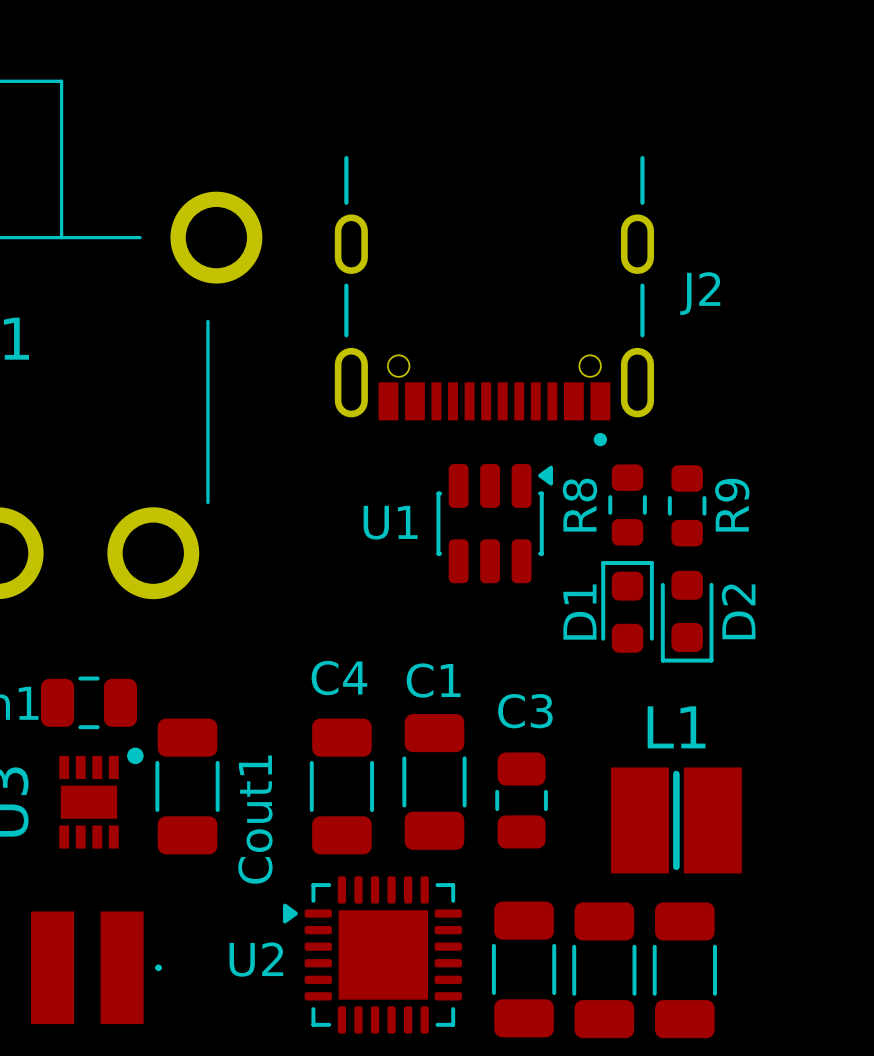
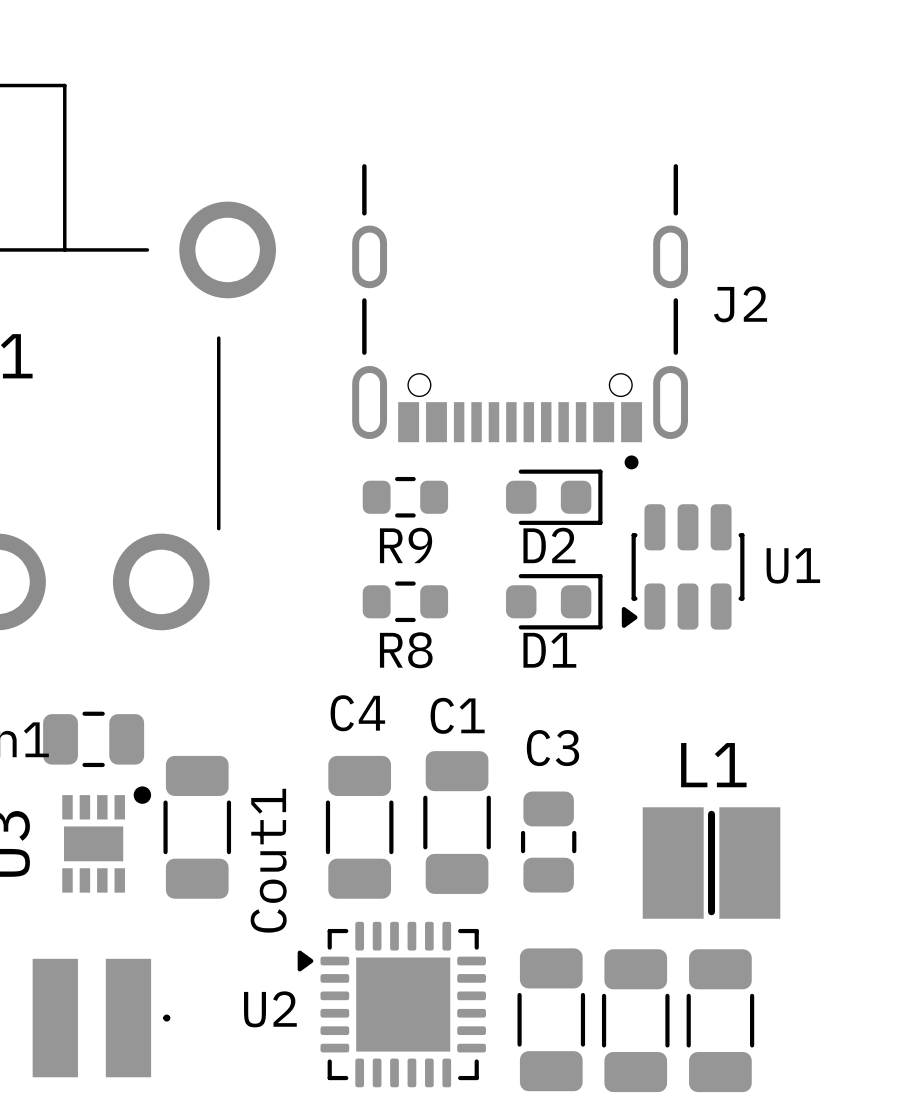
R8 rotation: 0° (627, 504) -> 90° clockwise (405, 601)
R8 position: (627, 504) -> (405, 601)
R9 rotation: 0° (687, 505) -> 90° clockwise (405, 497)
R9 position: (687, 505) -> (405, 497)
U1 rotation: 0° (494, 523) -> 180° (683, 566)
U1 position: (494, 523) -> (683, 566)
D1 rotation: 0° (627, 606) -> 90° clockwise (554, 601)
D1 position: (627, 606) -> (554, 601)
D2 name position: D2 (738, 611) -> D2 (549, 545)
D2 rotation: 0° (687, 616) -> 90° counterclockwise (554, 497)
D2 position: (687, 616) -> (554, 497)

